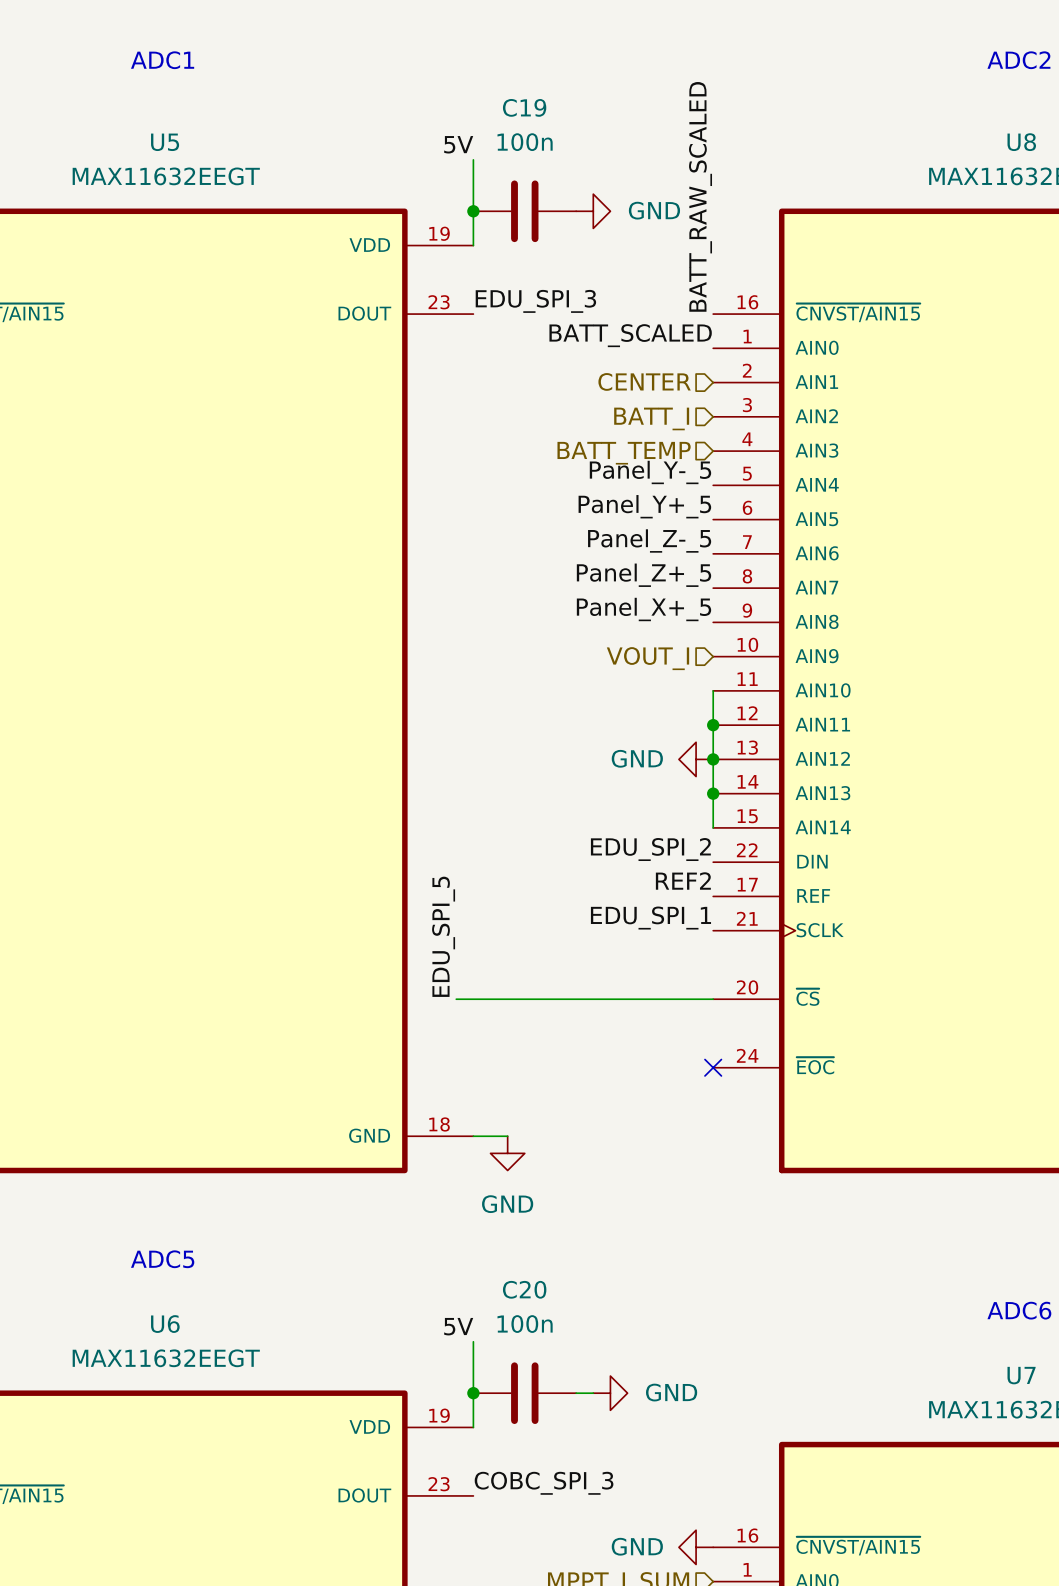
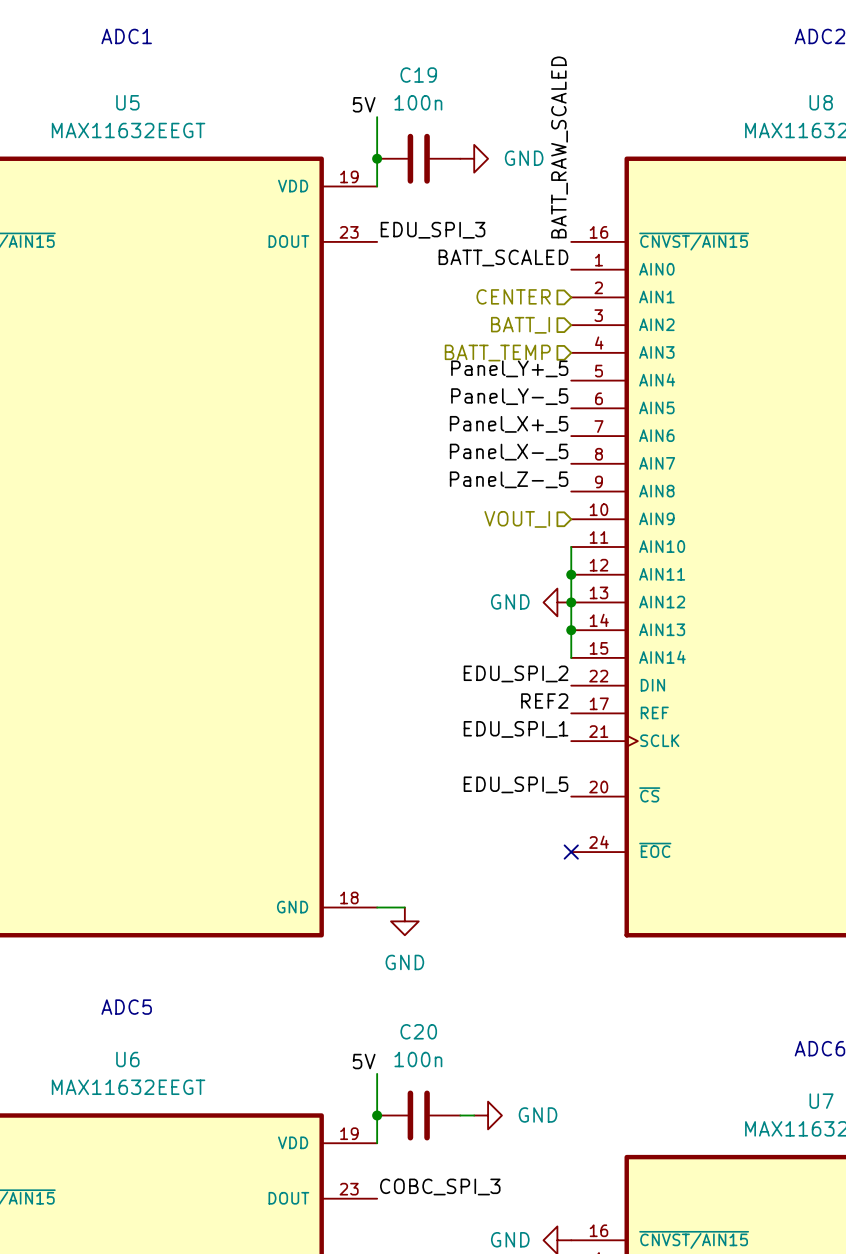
label: Panel_Y-_5 (650, 472) -> Panel_Y+_5 (509, 368)
label: Panel_Y+_5 (644, 506) -> Panel_Y-_5 (509, 396)
label: Panel_Z-_5 (649, 540) -> Panel_X+_5 (509, 424)
label: Panel_Z+_5 (643, 575) -> Panel_X-_5 (509, 452)
label: Panel_X+_5 (643, 609) -> Panel_Z-_5 (509, 479)
label rotation: 0° (443, 936) -> 90° clockwise (516, 784)
label position: EDU_SPI_5 (443, 936) -> EDU_SPI_5 (516, 784)
wire: (456, 999) (713, 999) -> none

